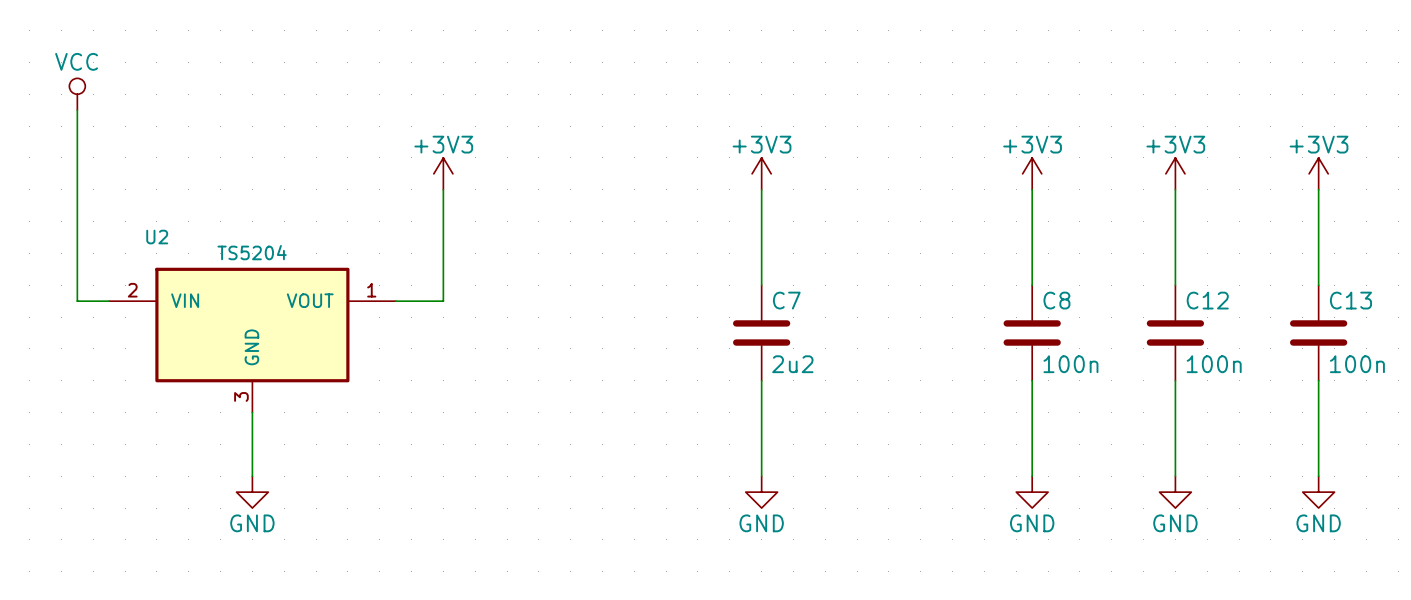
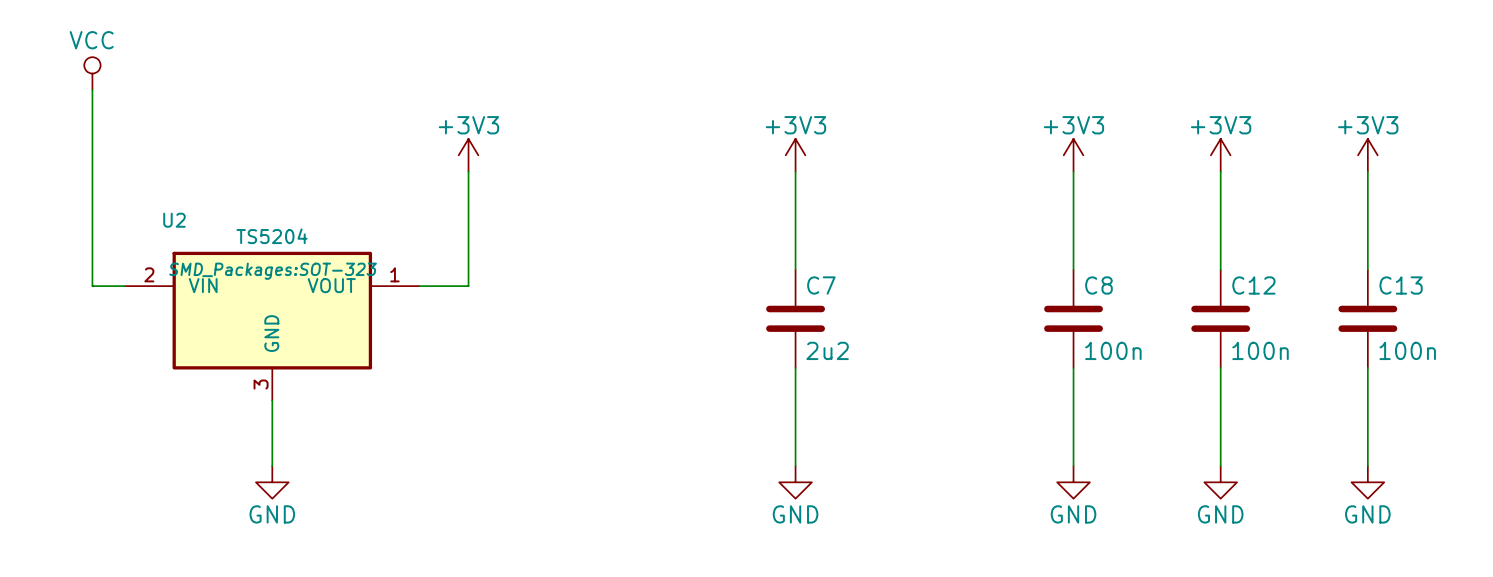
U2 text: none -> SMD_Packages:SOT-323 (273, 271)

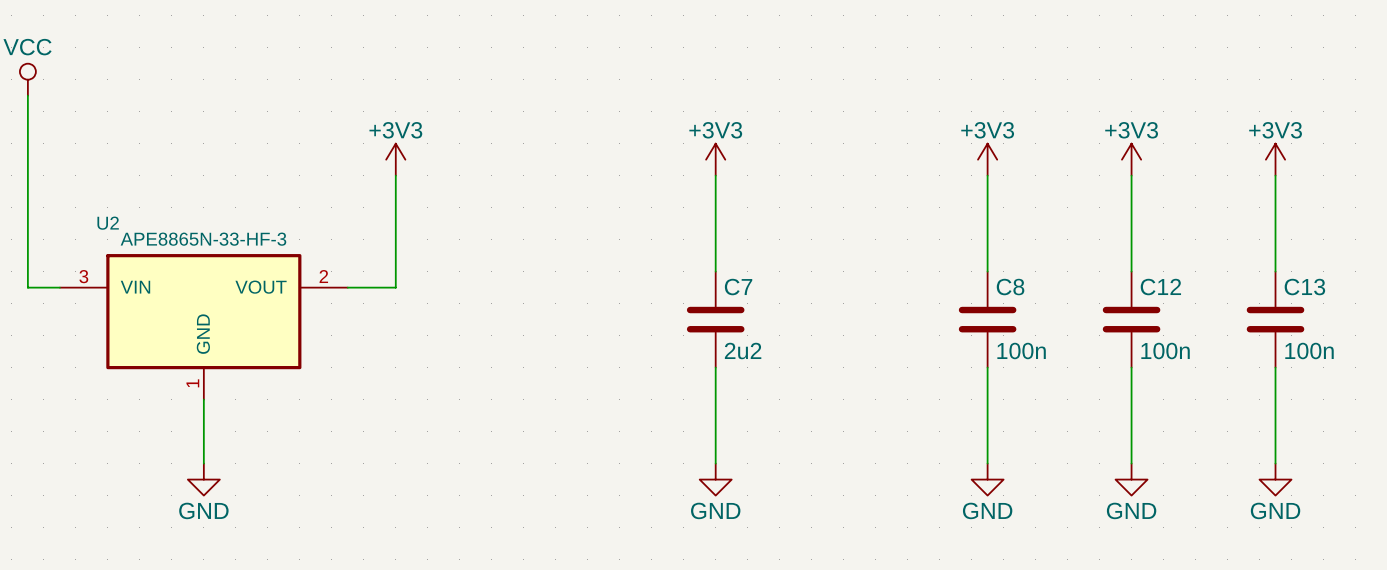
U2 value: TS5204 (271, 236) -> APE8865N-33-HF-3 (203, 239)
U2 text: SMD_Packages:SOT-323 (273, 271) -> none
U2 pin number: 2 (149, 274) -> 3 (83, 276)
U2 pin number: 1 (394, 274) -> 2 (323, 276)
U2 pin number: 3 (261, 384) -> 1 (192, 383)

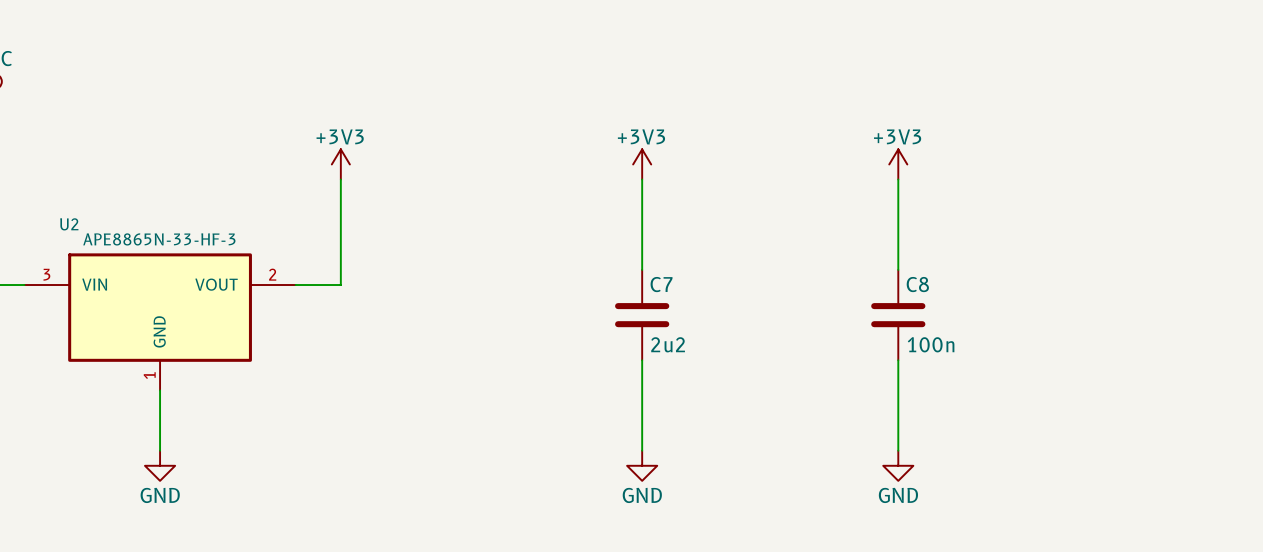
power symbol: +3V3 (1131, 159) -> none
power symbol: +3V3 (1275, 159) -> none
wire: (1131, 175) (1131, 271) -> none
wire: (1275, 175) (1275, 271) -> none
C12: 100n (1131, 319) -> none
C13: 100n (1275, 319) -> none
wire: (1131, 367) (1131, 463) -> none
wire: (1275, 367) (1275, 463) -> none
power symbol: GND (1131, 479) -> none
power symbol: GND (1275, 479) -> none

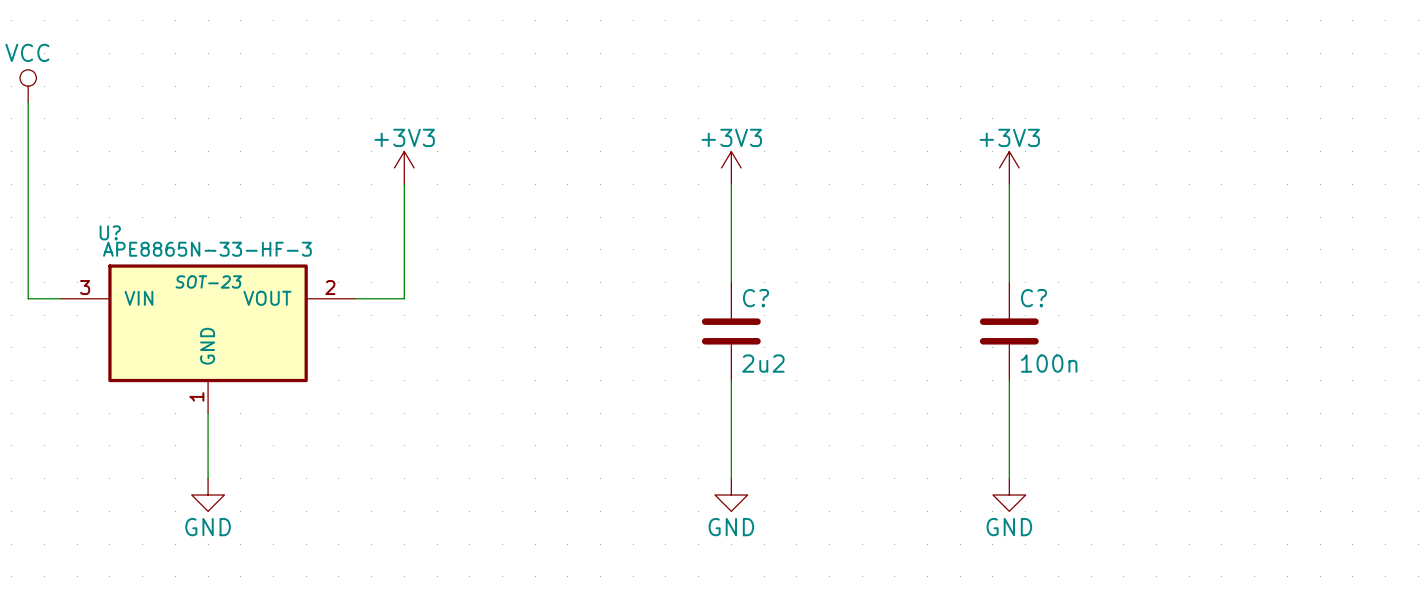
U2 name: U2 (69, 224) -> U? (110, 232)
U2 text: none -> SOT-23 (208, 281)
C7 name: C7 (661, 284) -> C? (756, 298)
C8 name: C8 (917, 284) -> C? (1033, 298)

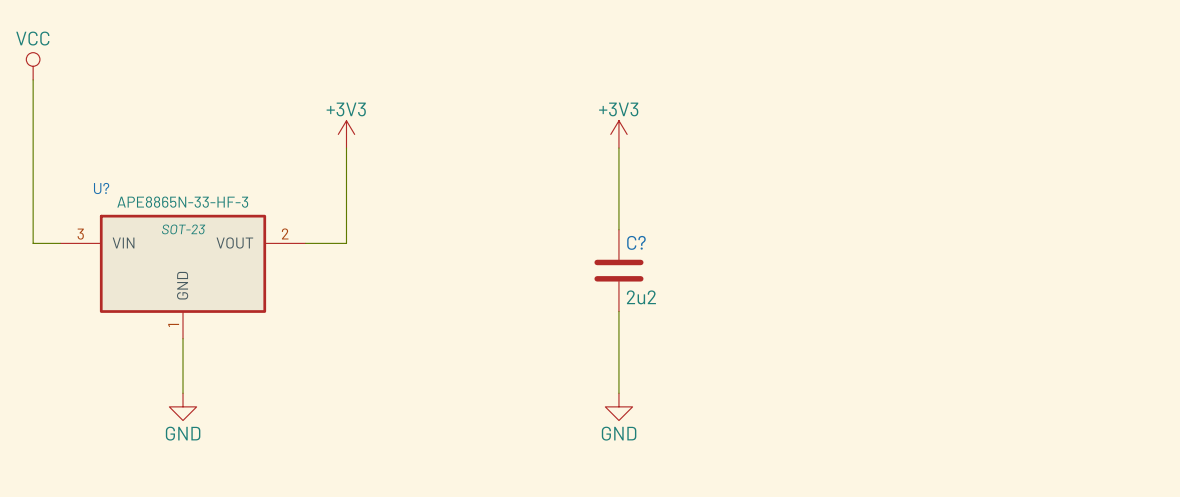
power symbol: +3V3 (1009, 167) -> none
wire: (1009, 184) (1009, 282) -> none
C?: 100n (1009, 331) -> none
wire: (1009, 380) (1009, 478) -> none
power symbol: GND (1009, 495) -> none

